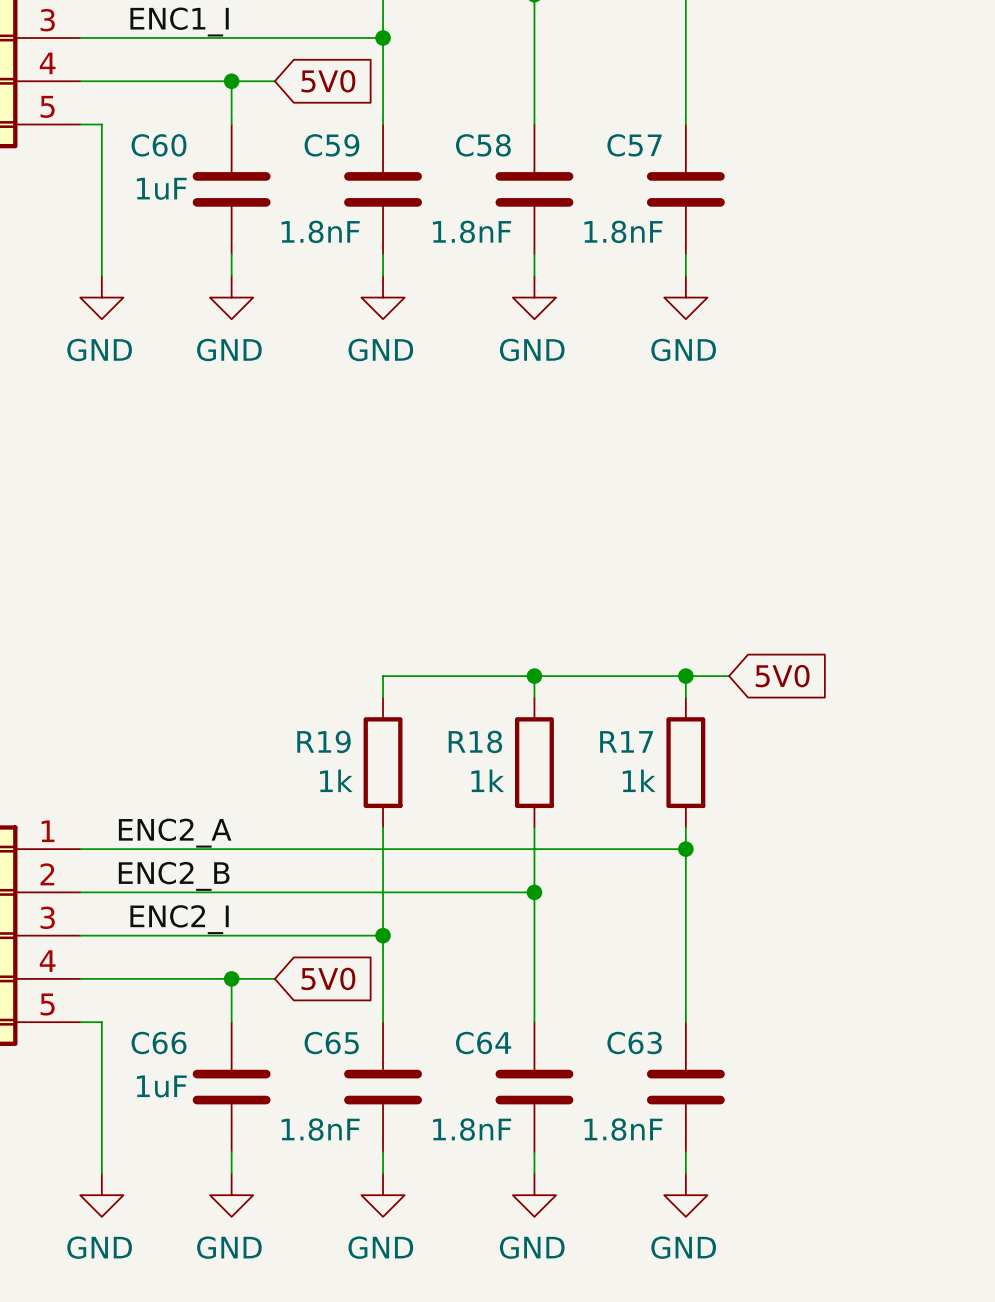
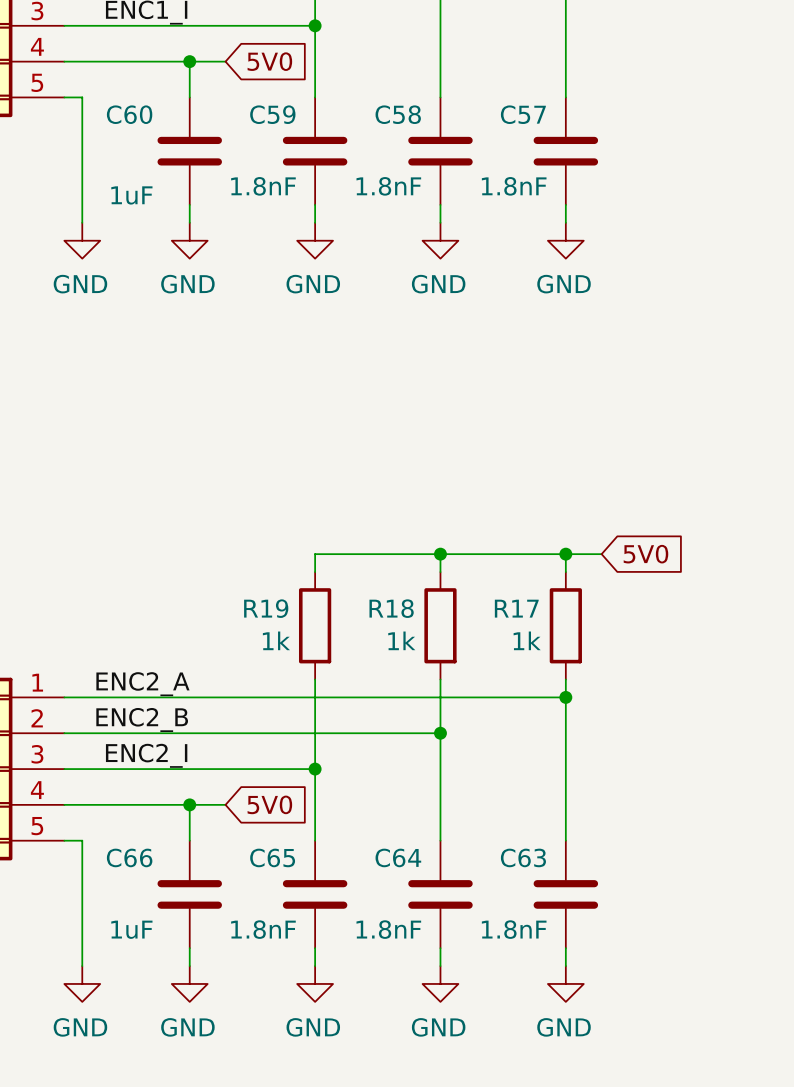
C60 value position: 1uF (161, 188) -> 1uF (131, 195)
C66 value position: 1uF (161, 1086) -> 1uF (131, 929)

